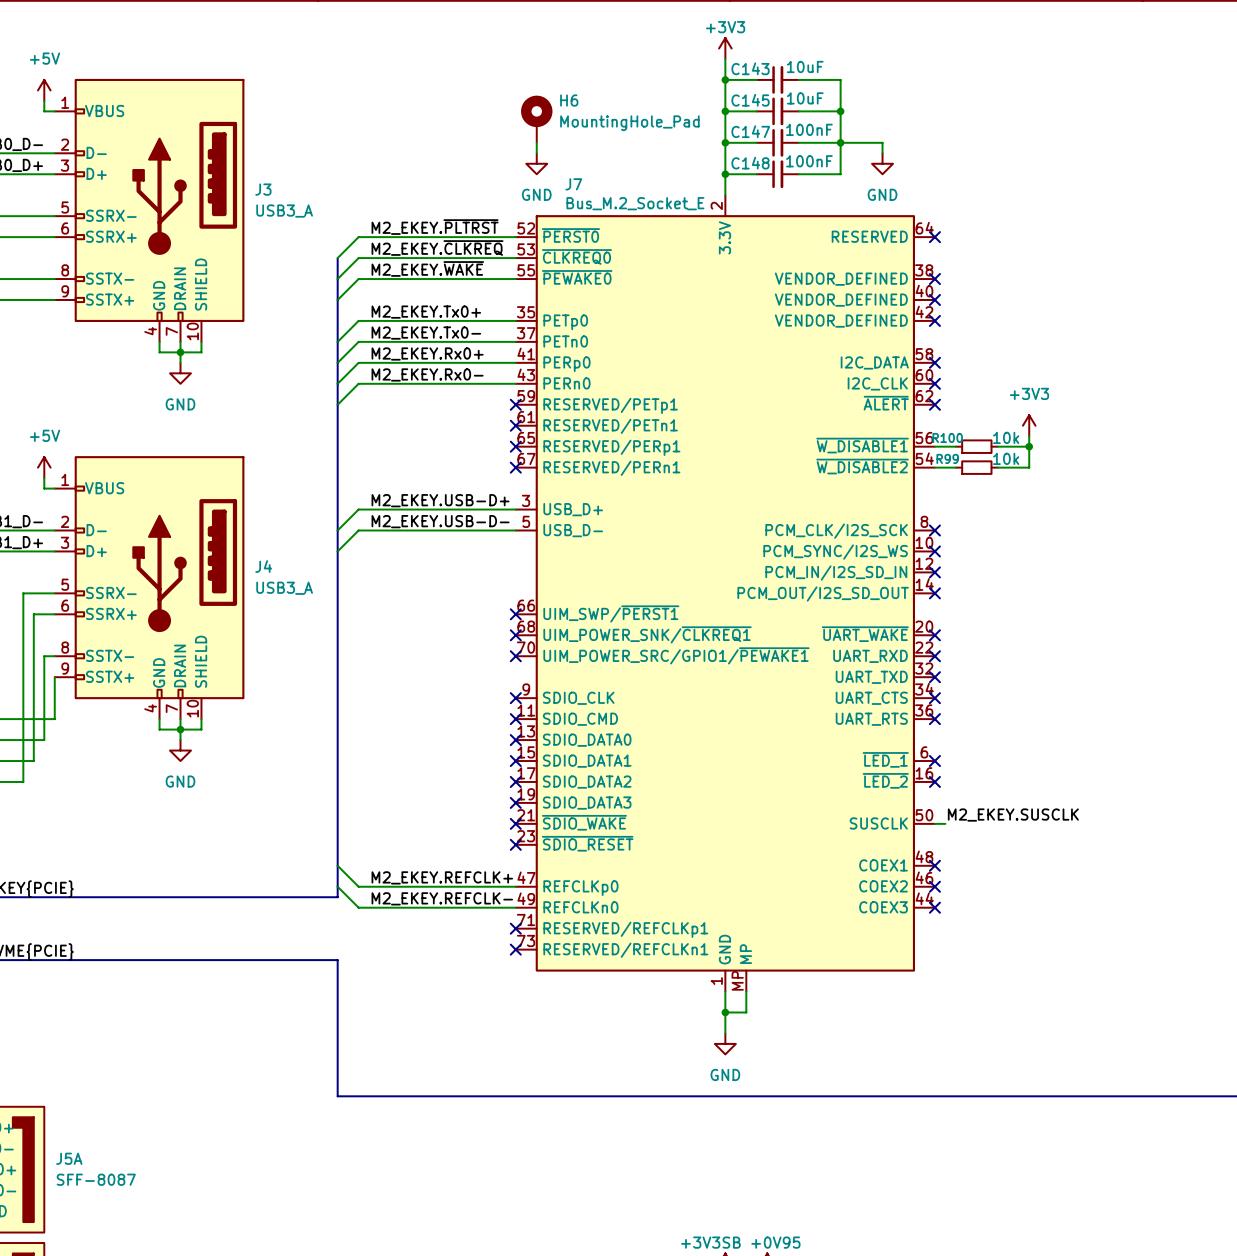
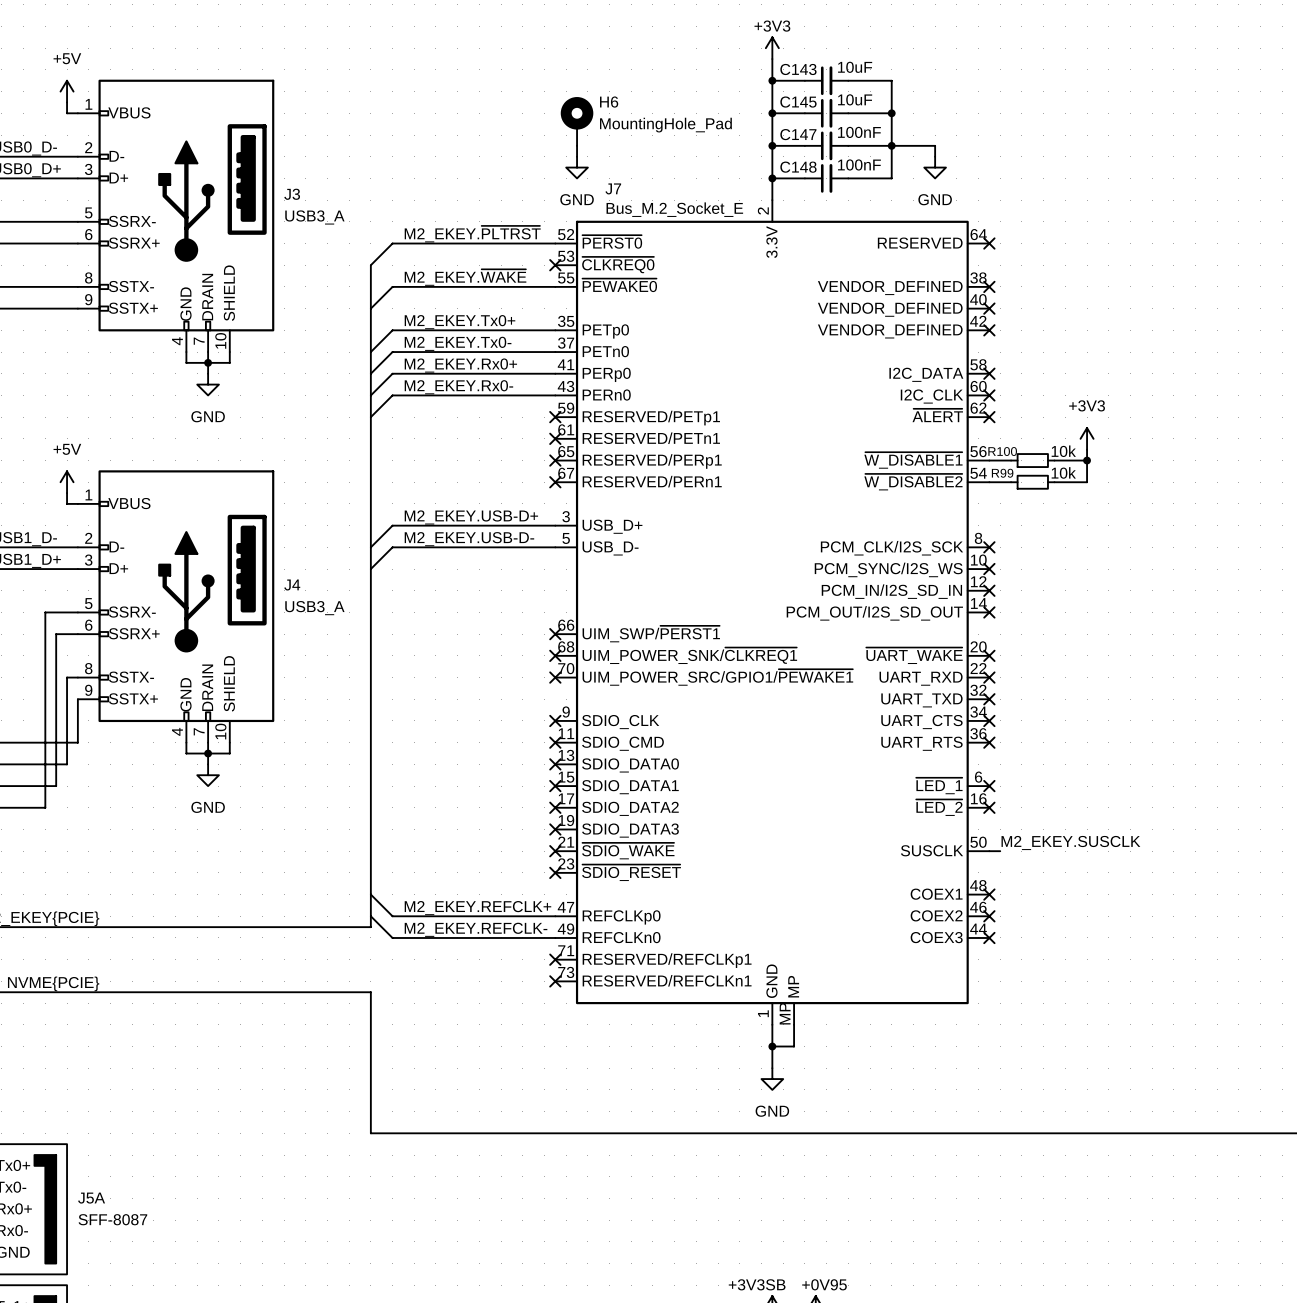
label: M2_EKEY.~{CLKREQ} (437, 248) -> none
wire: (515, 258) (358, 258) (337, 279) -> none
no-connect mark: none -> (555, 265)

